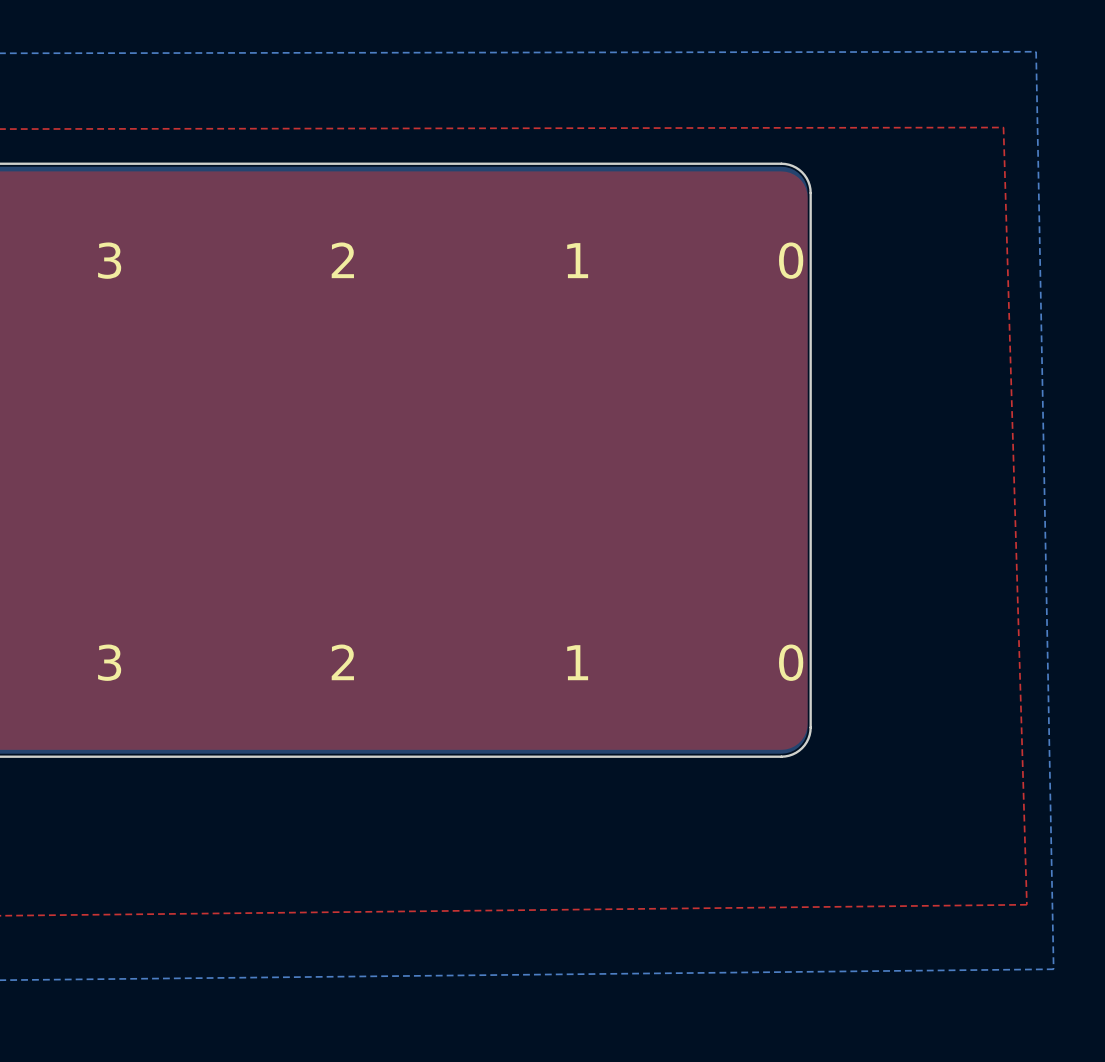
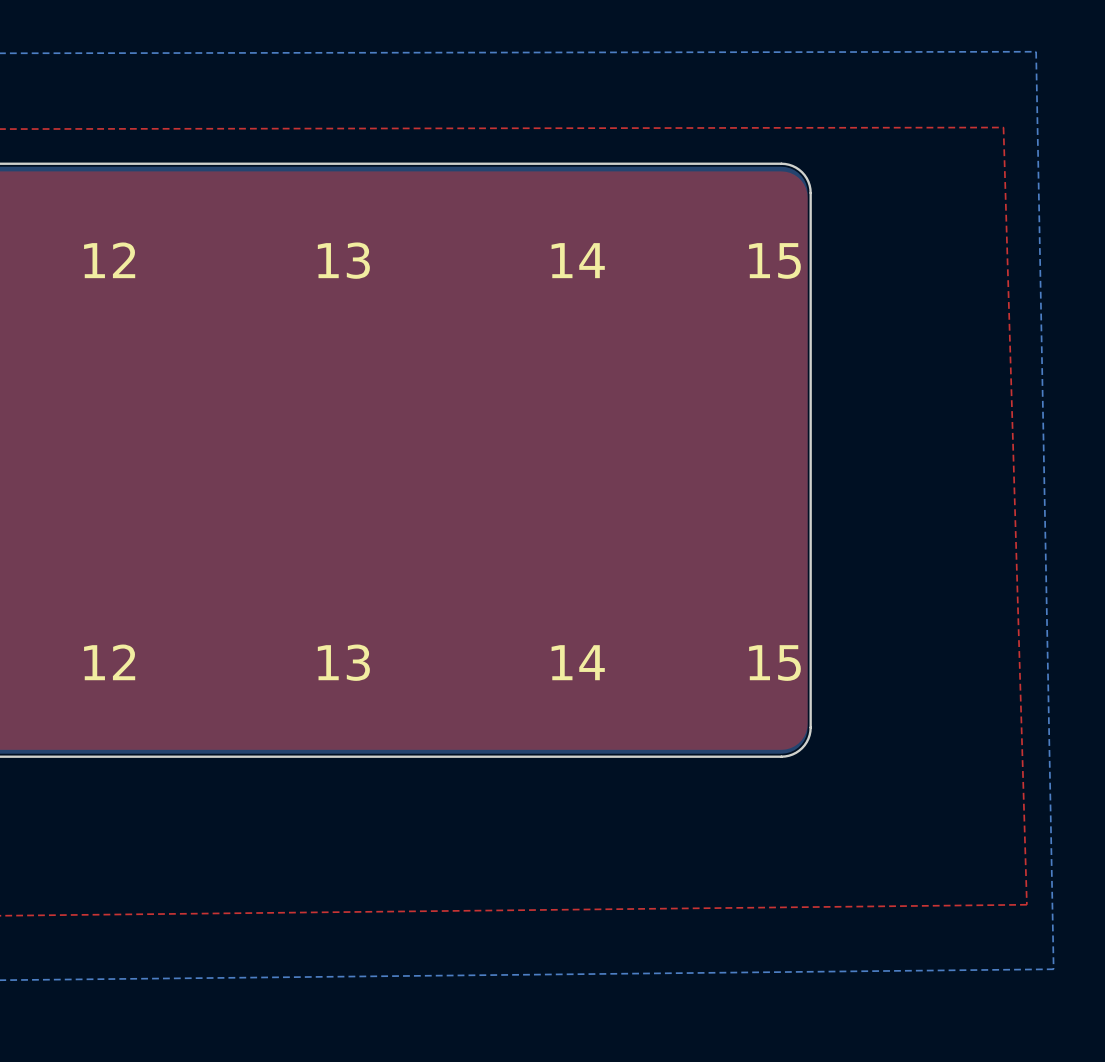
text: 3 (109, 260) -> 12 (109, 260)
text: 2 (342, 260) -> 13 (343, 260)
text: 1 (577, 260) -> 14 (578, 260)
text: 0 (791, 260) -> 15 (774, 260)
text: 3 (109, 662) -> 12 (109, 662)
text: 2 (342, 662) -> 13 (343, 662)
text: 1 (577, 662) -> 14 (578, 662)
text: 0 (791, 662) -> 15 (774, 663)

